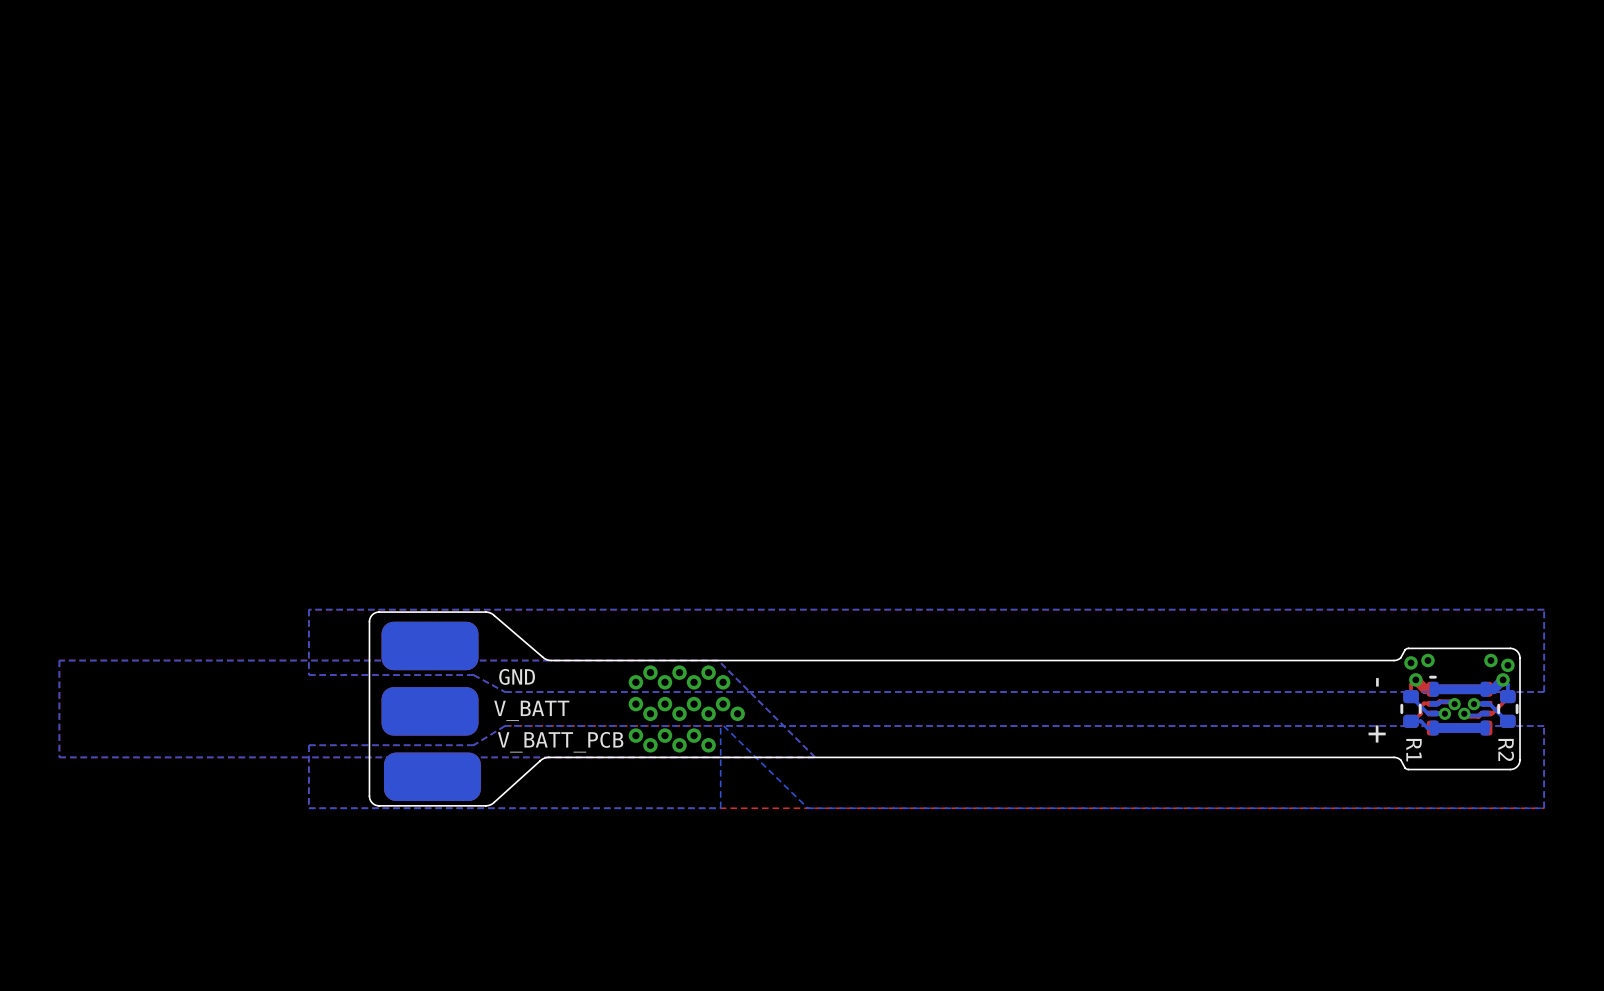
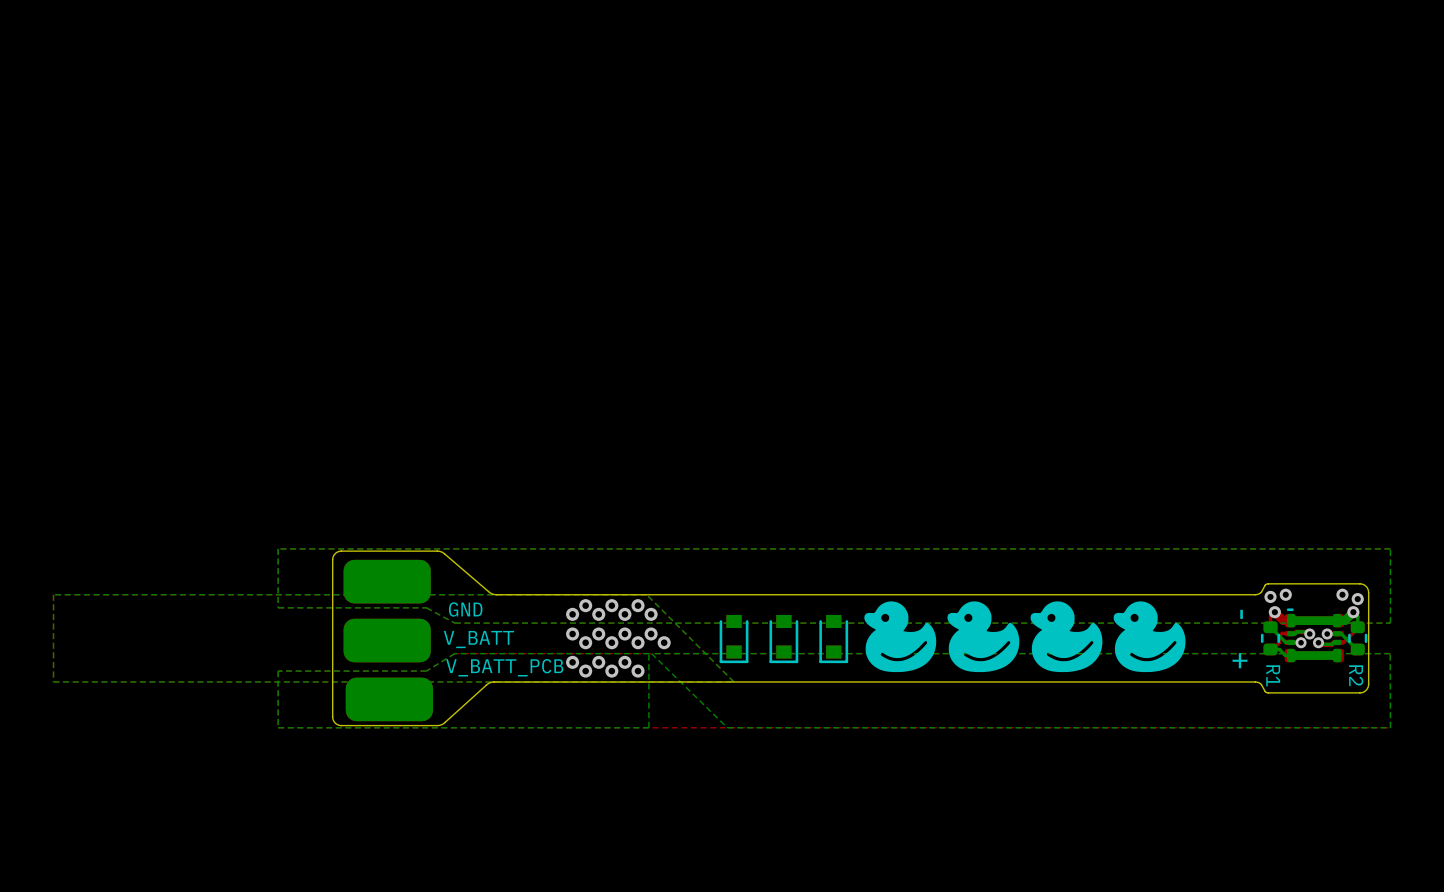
drawing: none -> [864, 601, 1186, 673]
part: none -> (734, 639)
part: none -> (783, 639)
part: none -> (833, 639)

